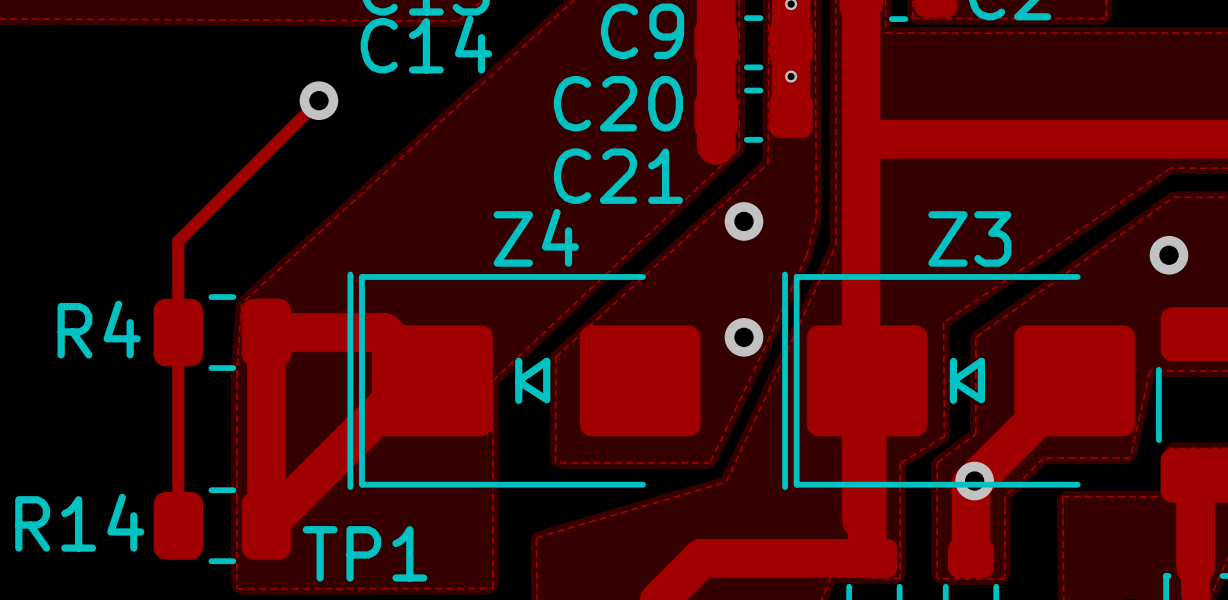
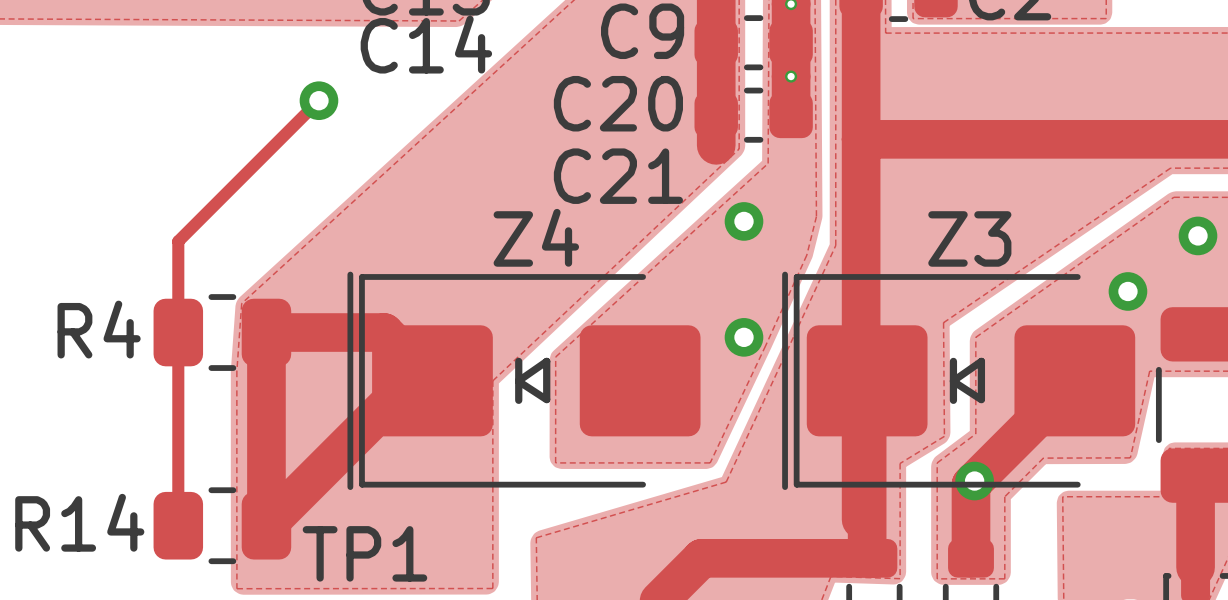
via position: (1169, 255) -> (1197, 235)
via: none -> (1127, 291)

